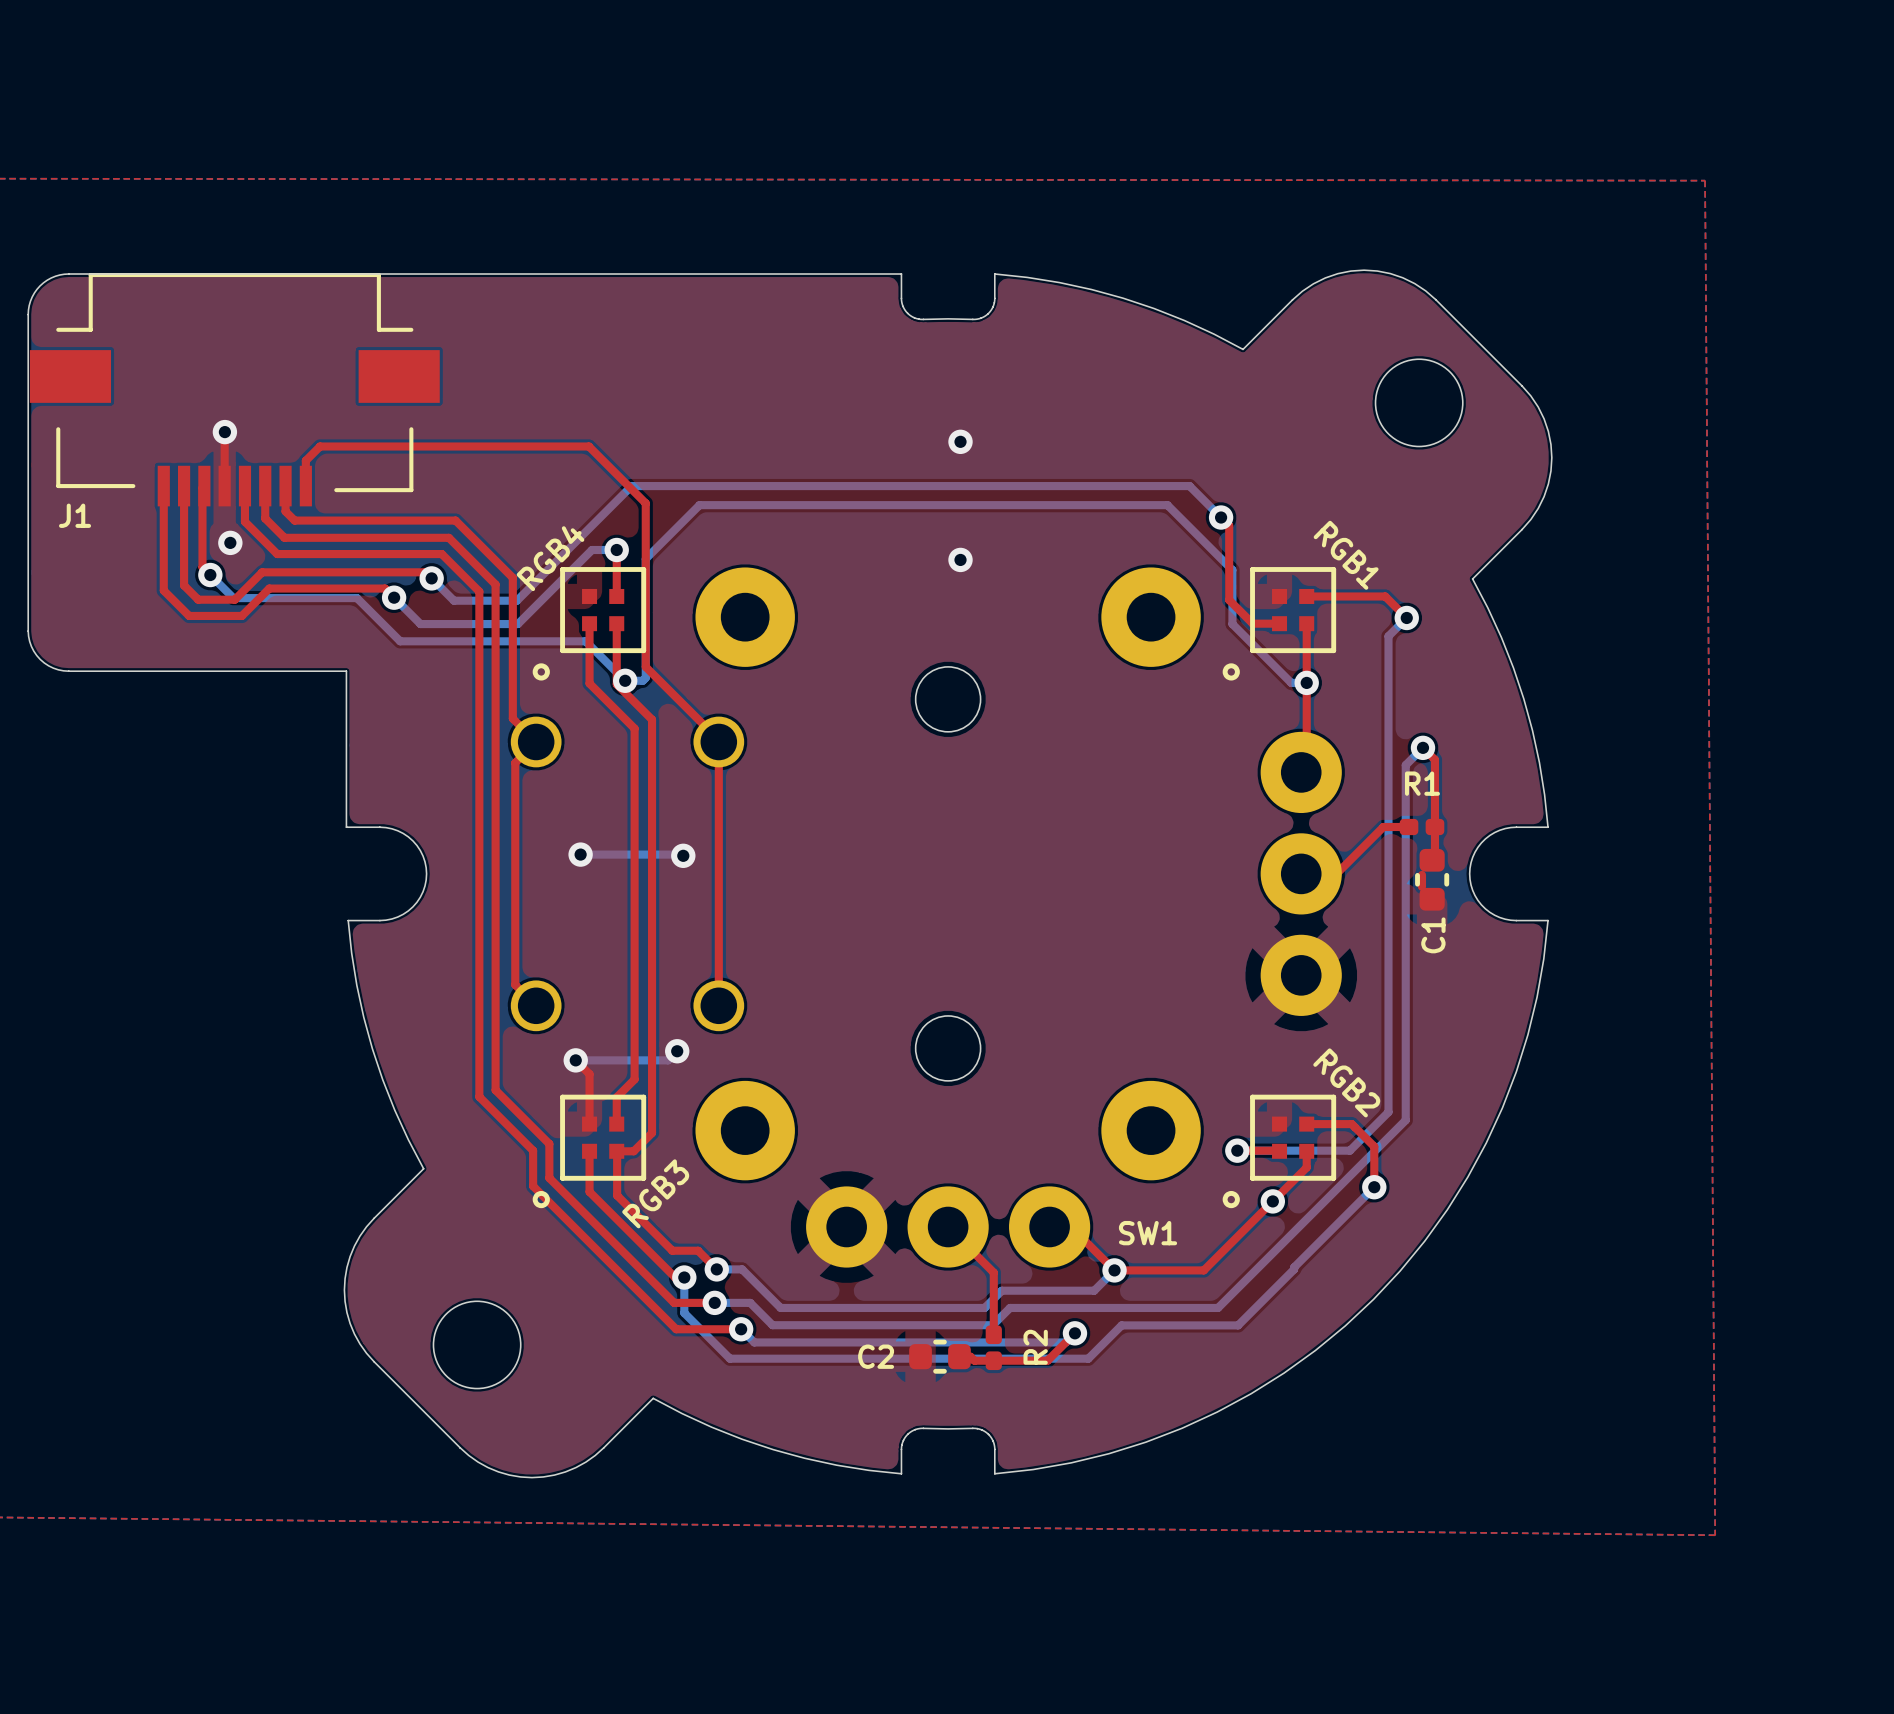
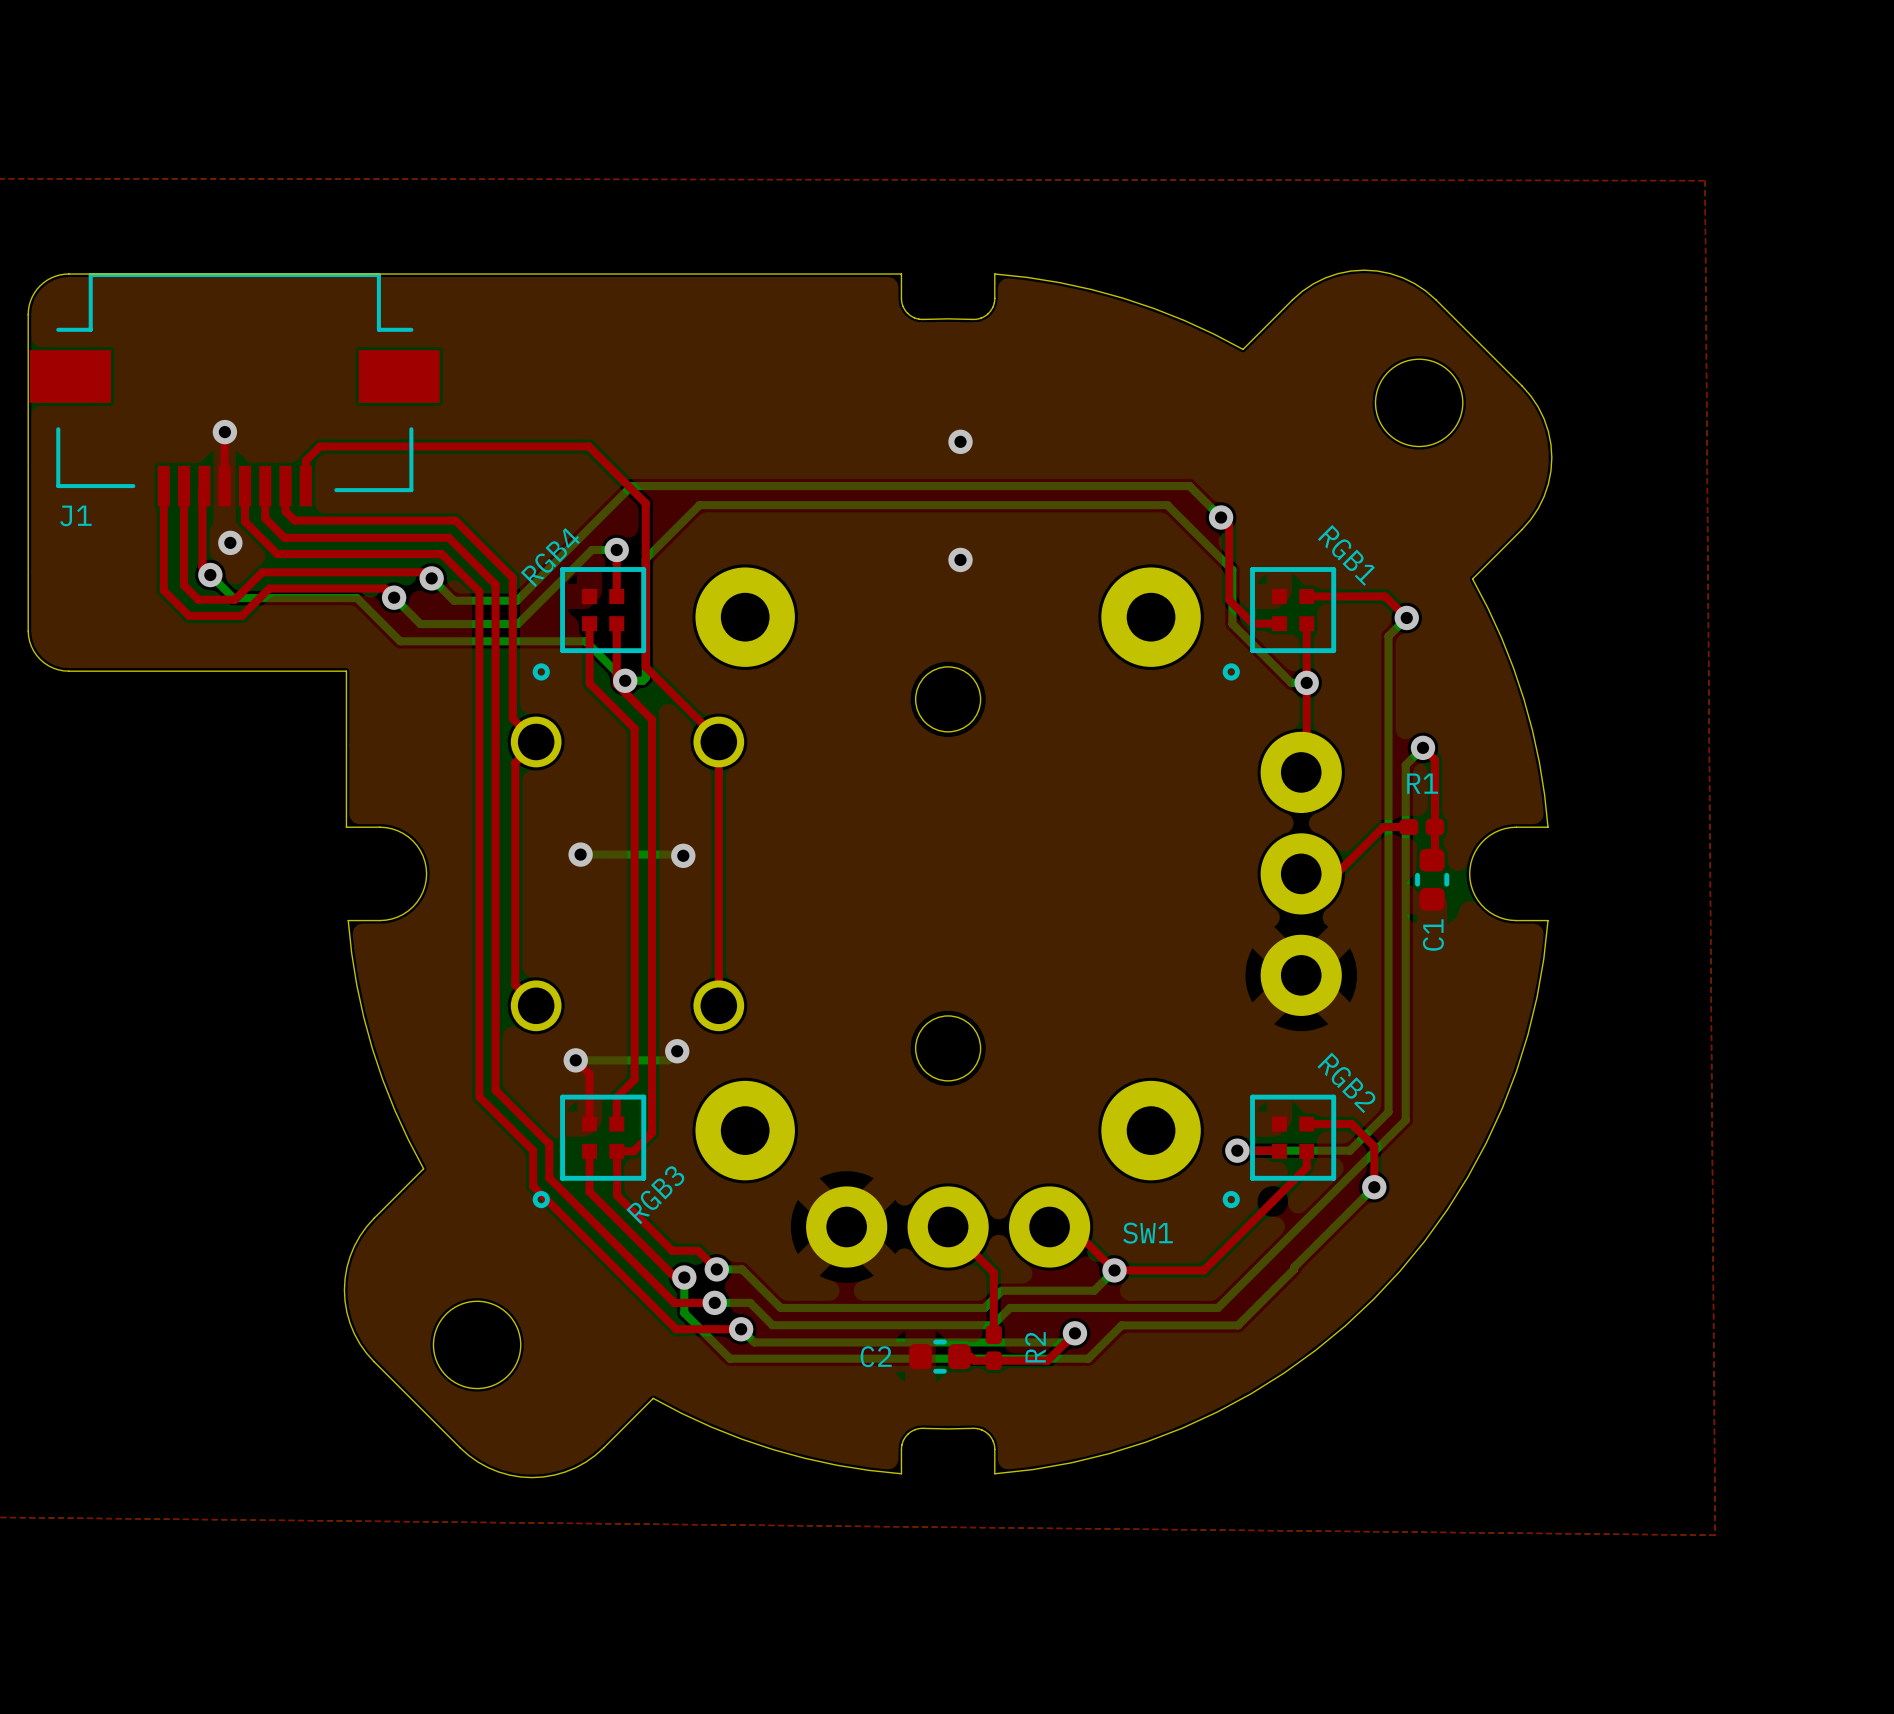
top track: (1421, 874) (1421, 886) -> none
via: (1272, 1201) -> none

